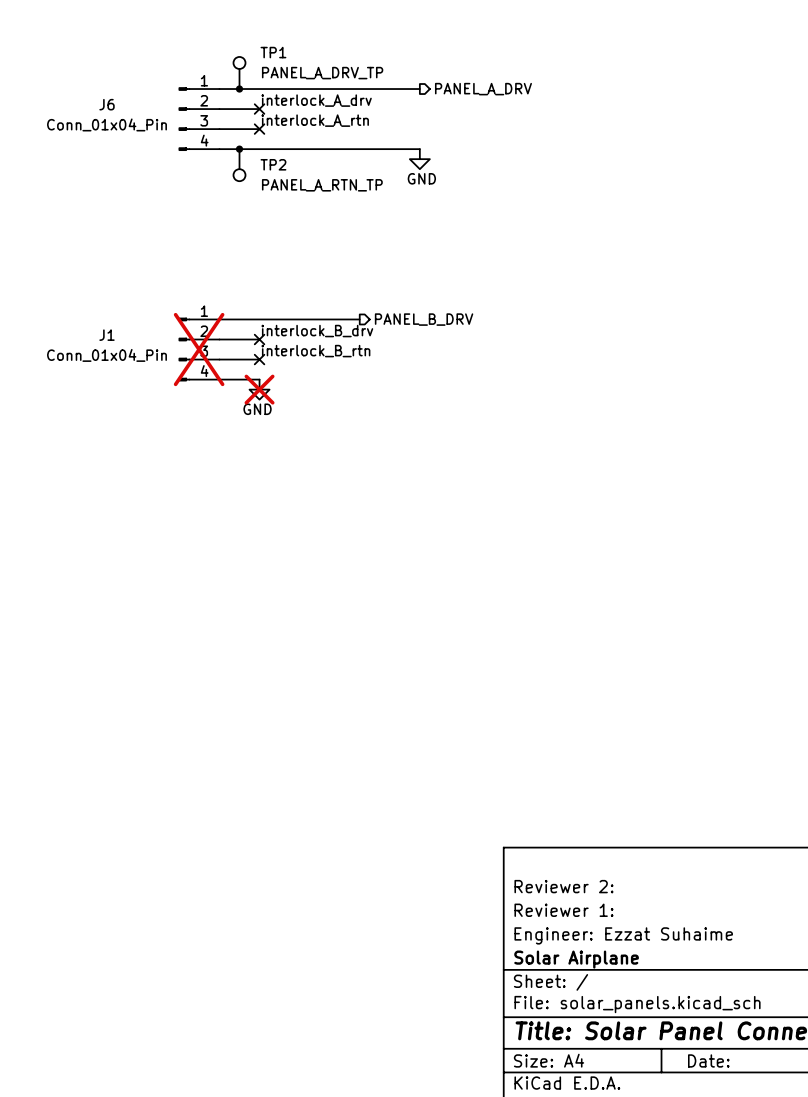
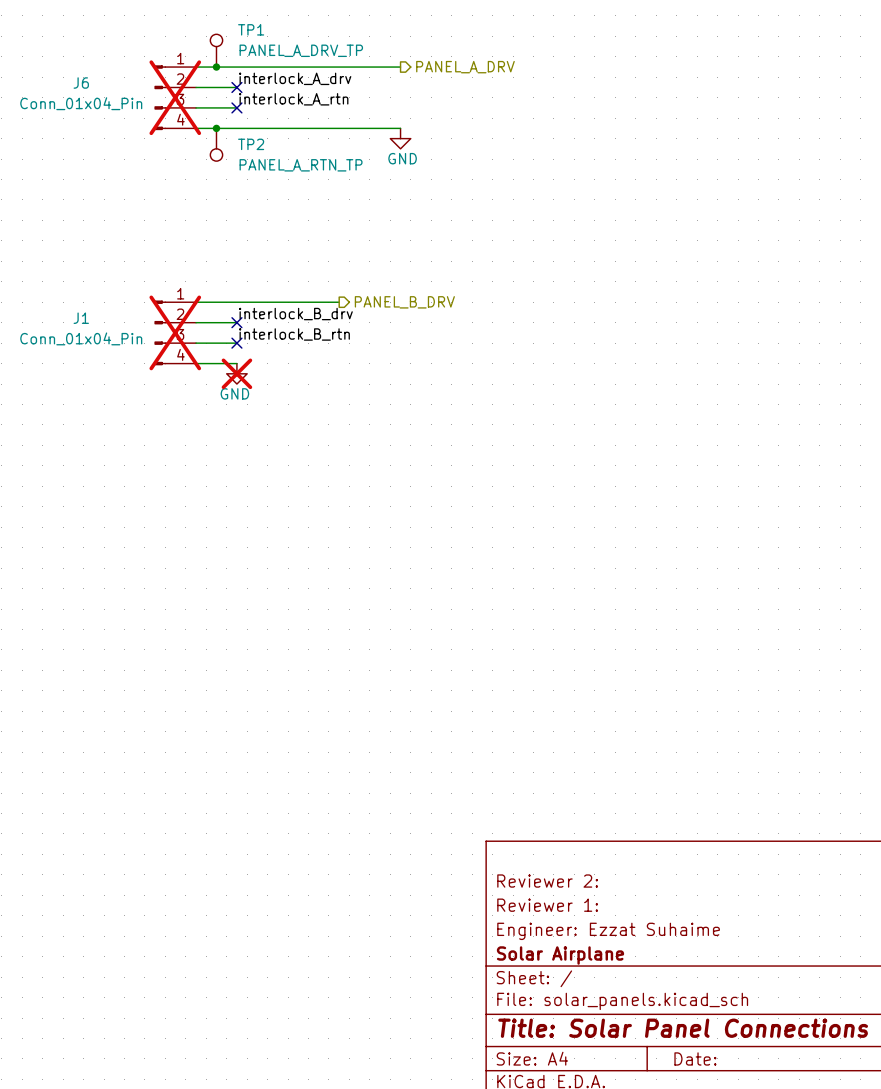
J6 do-not-place cross: none -> (175, 97)

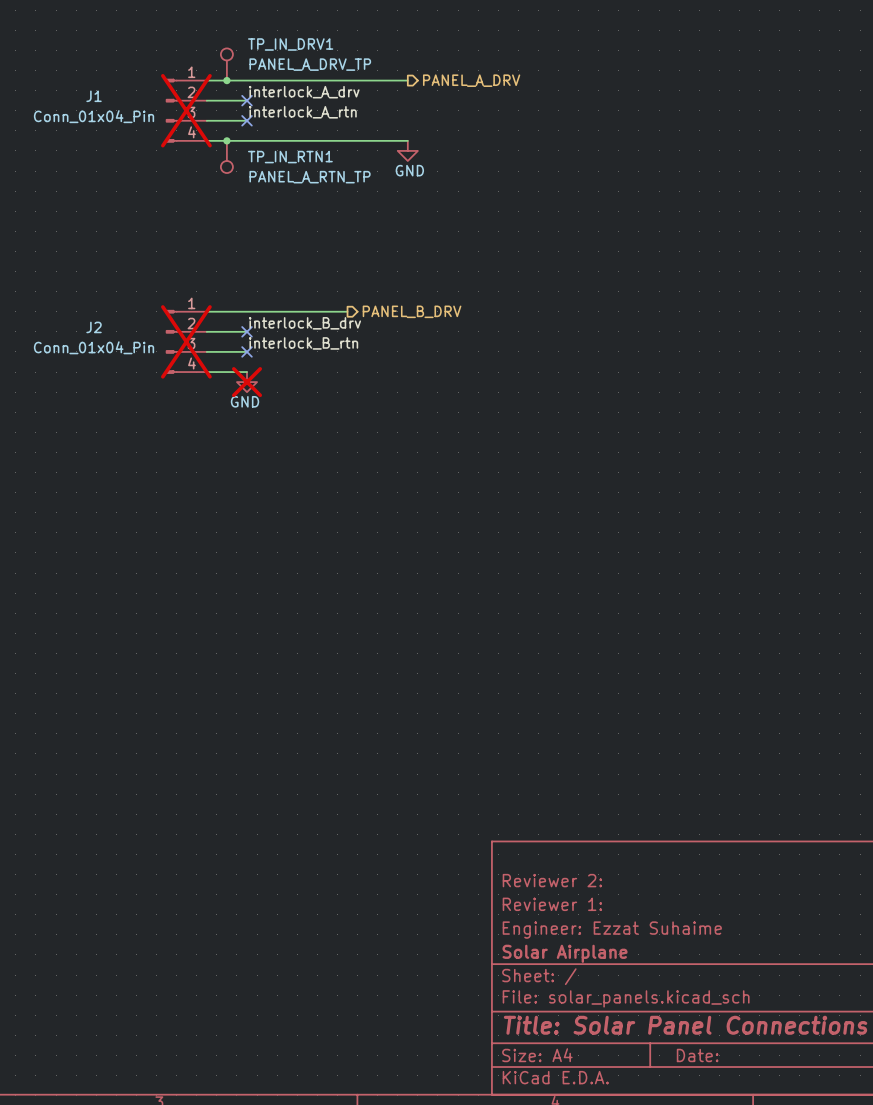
TP1 name: TP1 (251, 29) -> TP_IN_DRV1 (290, 44)
J6 name: J6 (81, 83) -> J1 (94, 96)
TP2 name: TP2 (251, 144) -> TP_IN_RTN1 (290, 157)
J1 name: J1 (81, 318) -> J2 (94, 327)

